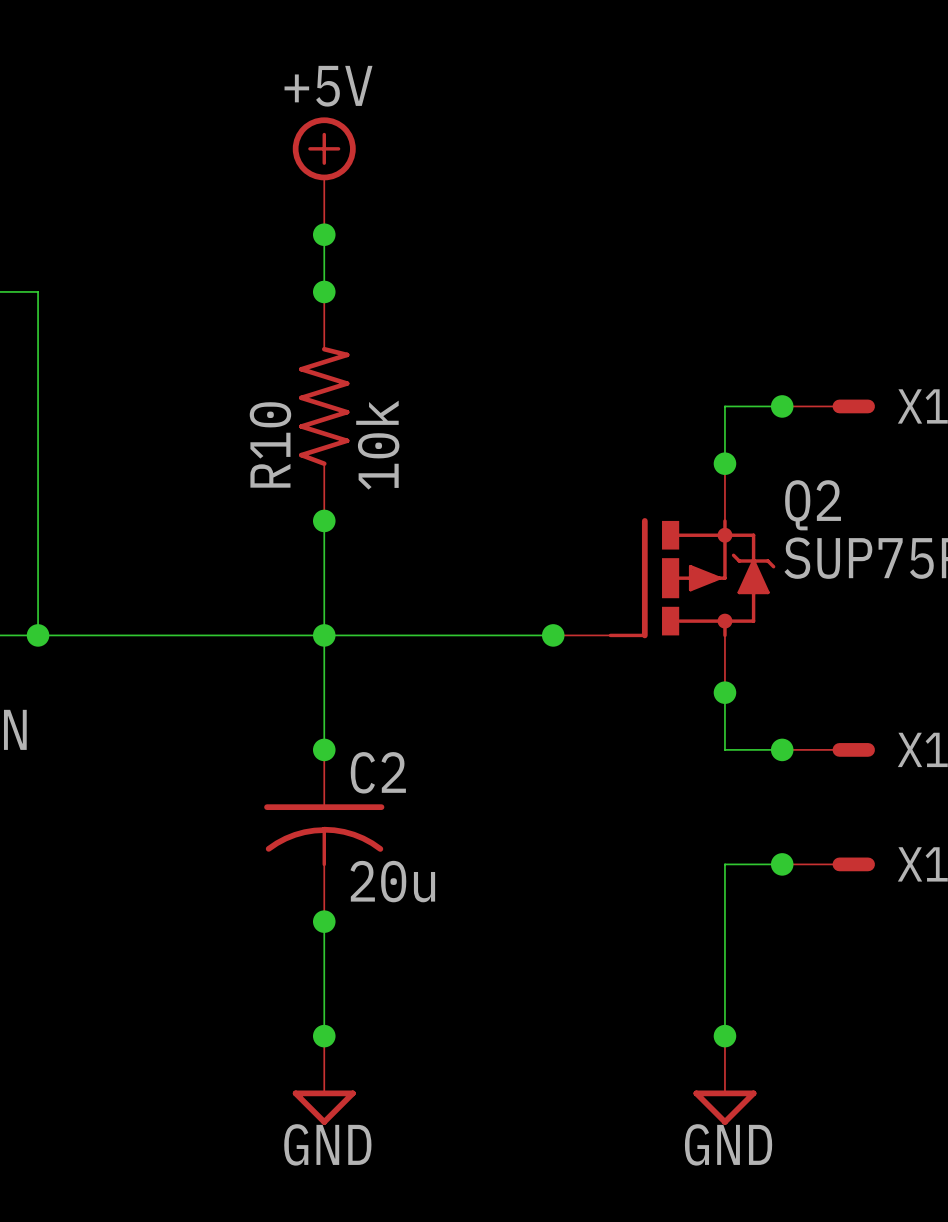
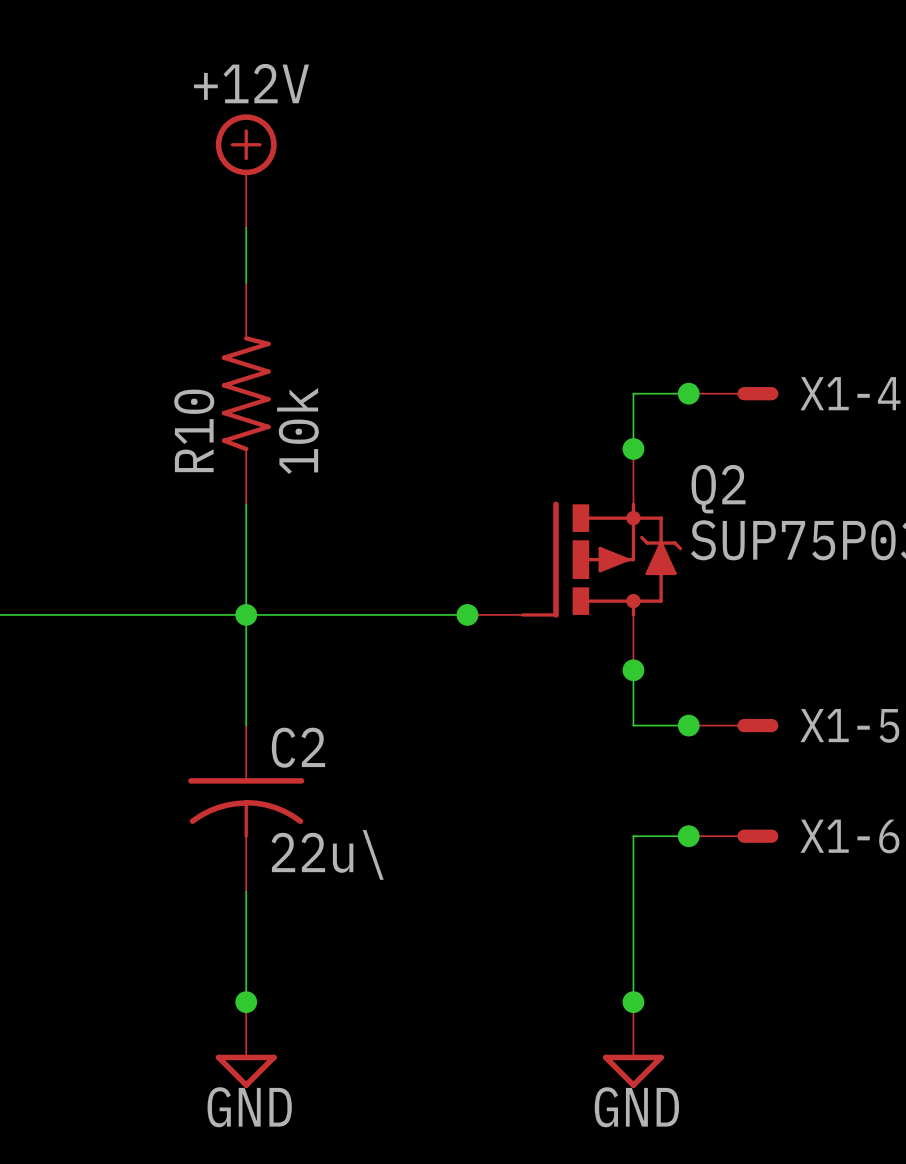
power symbol: +5V (324, 176) -> +12V (246, 171)
junction: (324, 234) -> none
junction: (324, 291) -> none
junction: (324, 520) -> none
junction: (324, 749) -> none
C2 value: 20u (392, 881) -> 22u\ (327, 854)
junction: (324, 921) -> none

